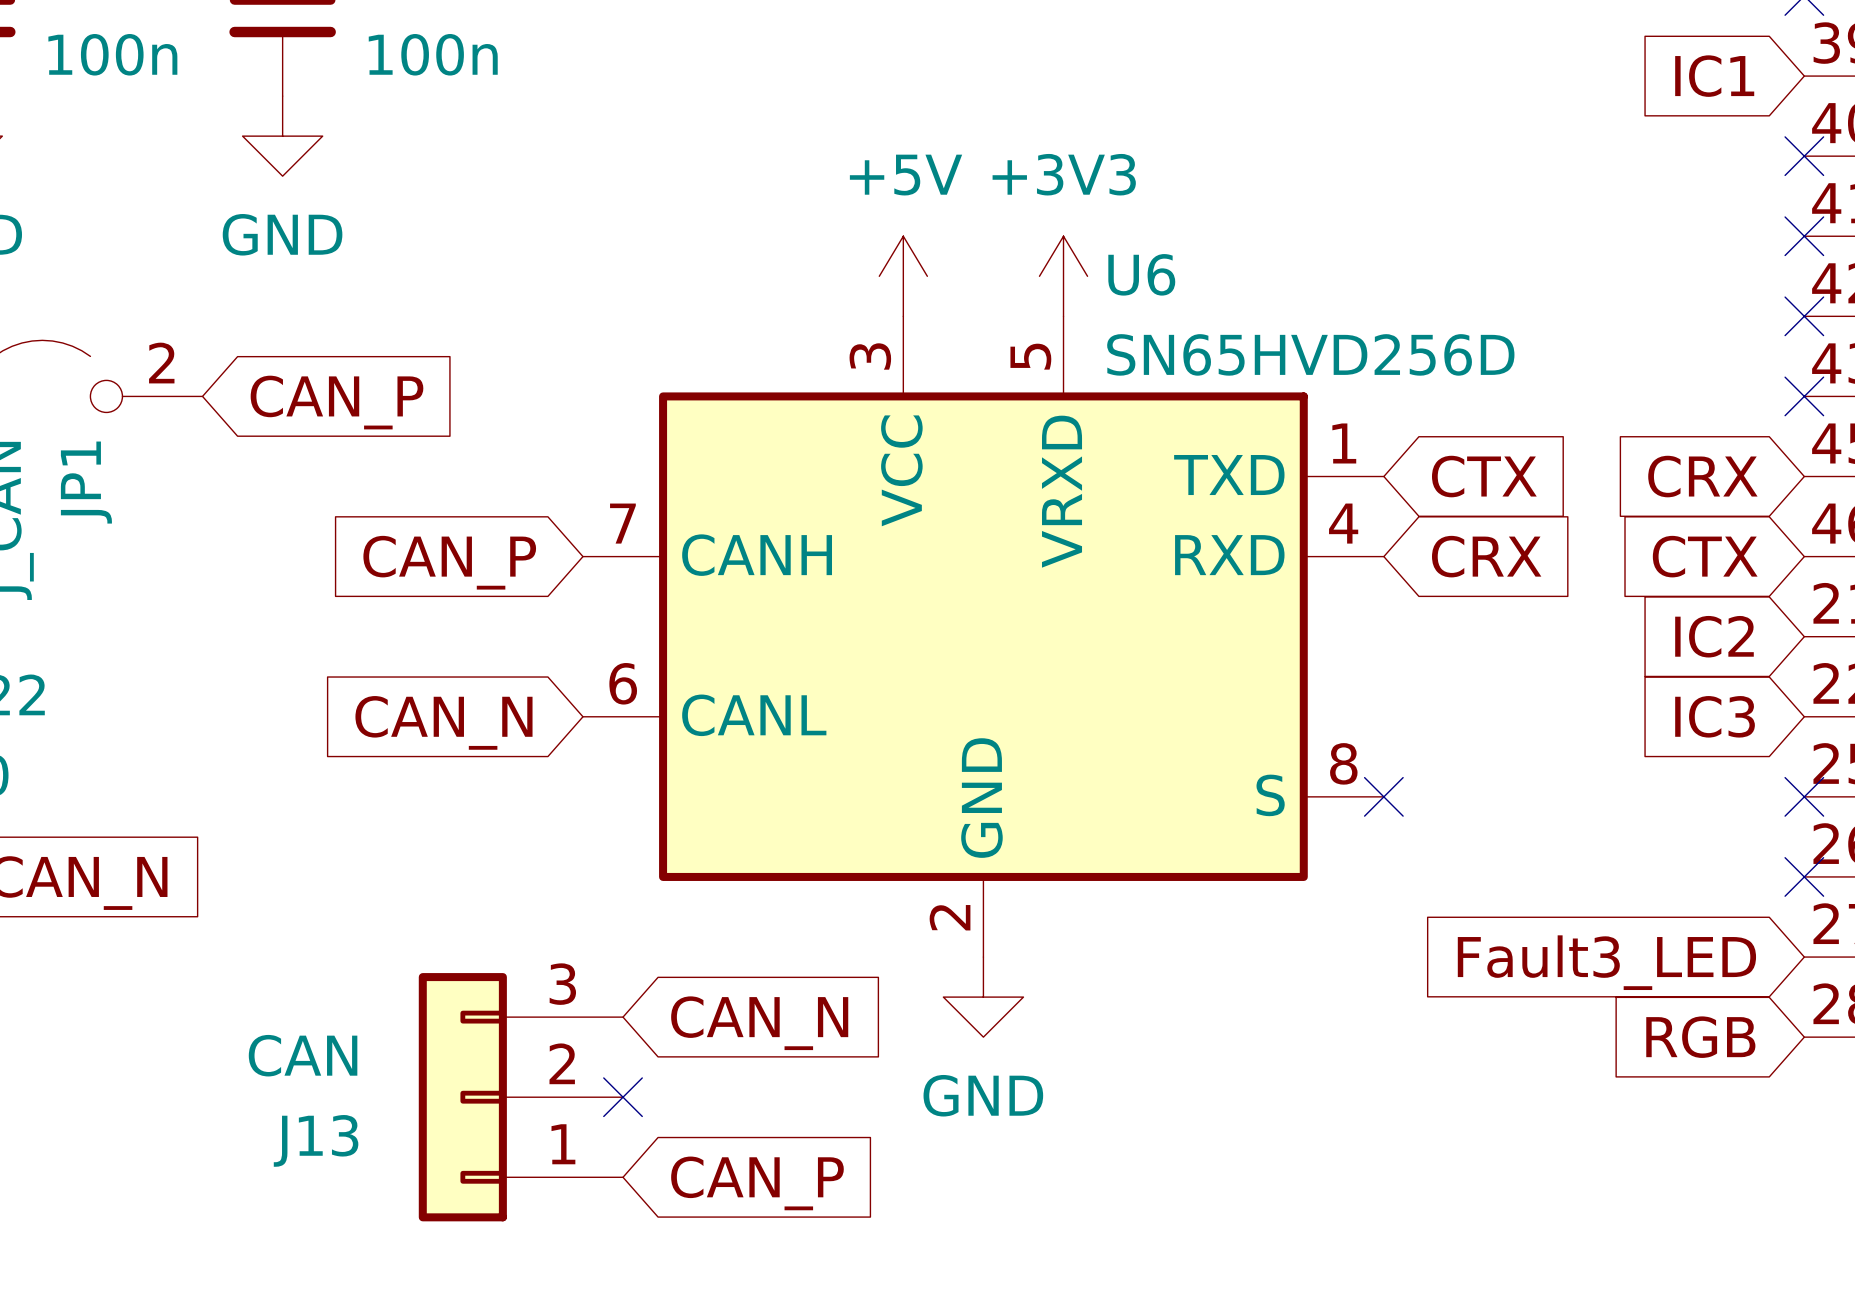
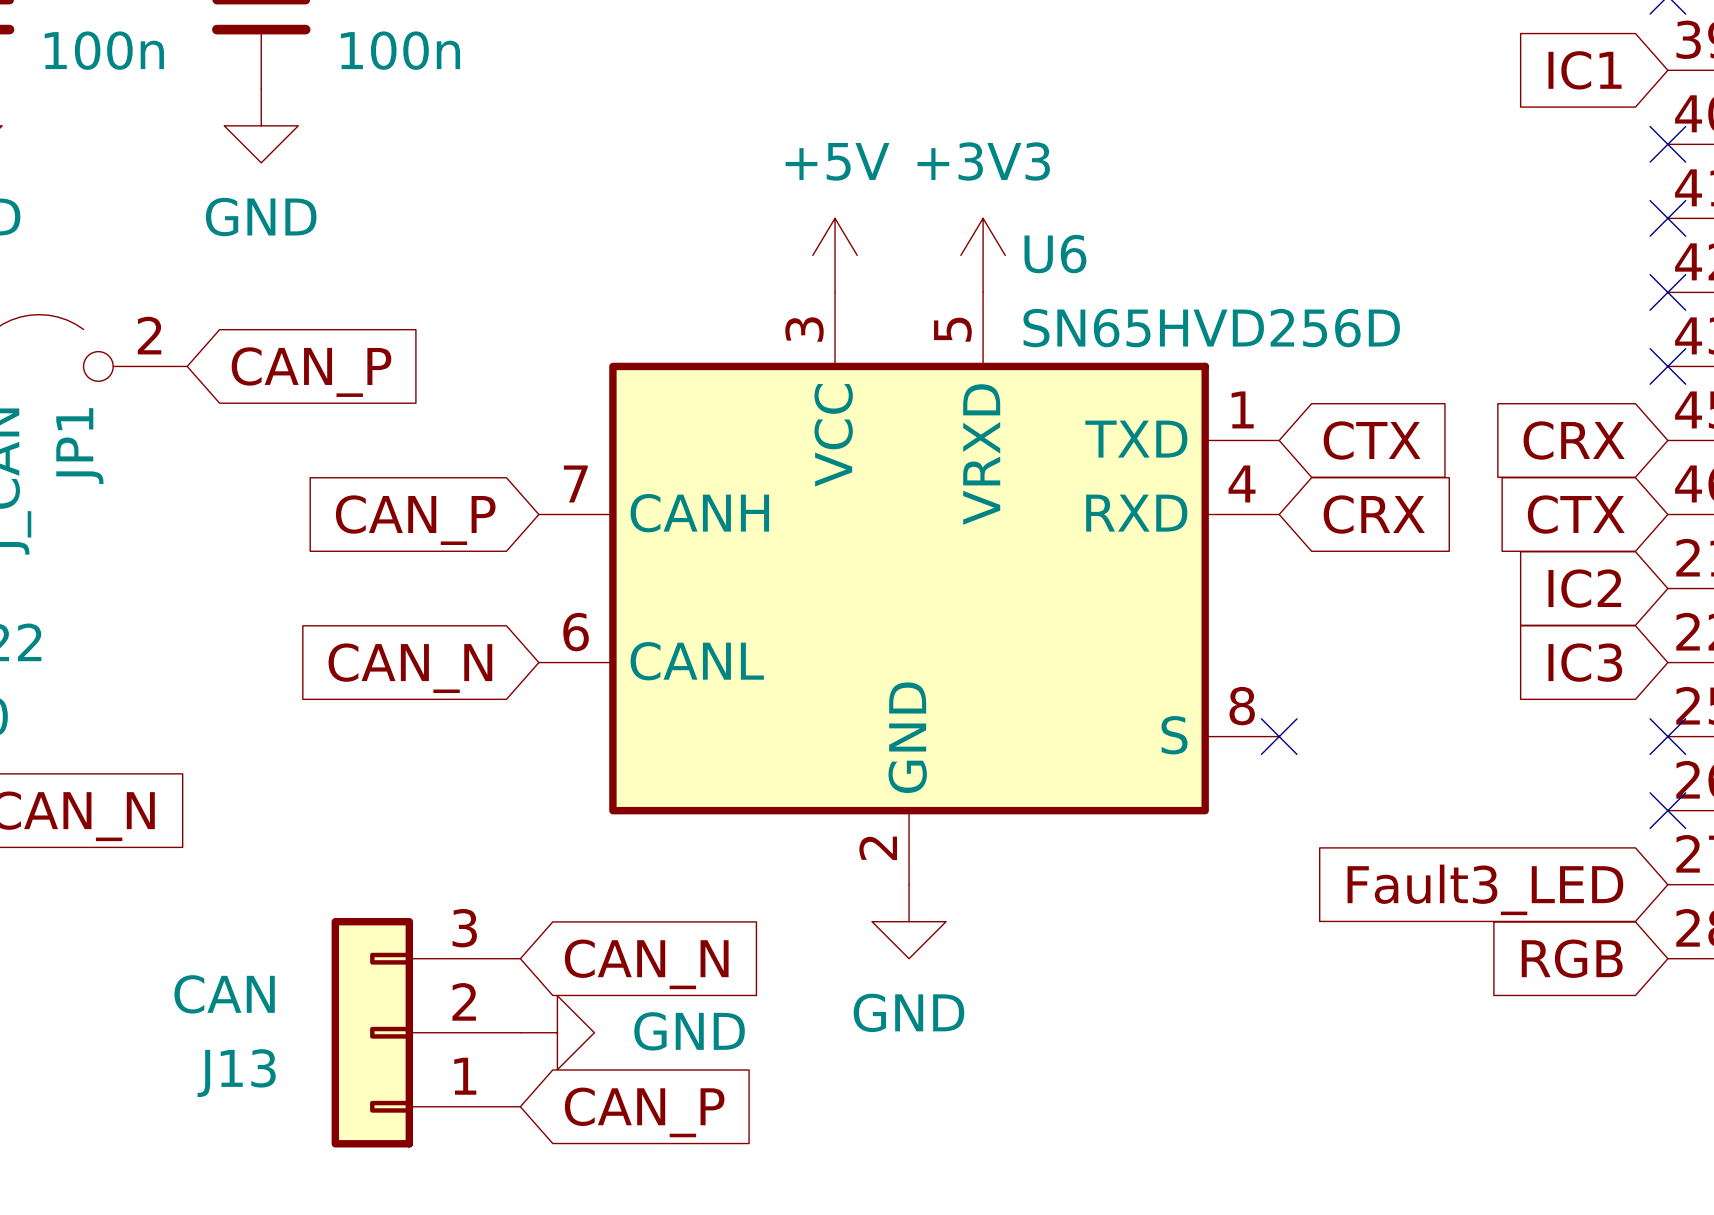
global label position: CAN_N (759, 1023) -> CAN_N (646, 964)
J13 position: (520, 1097) -> (425, 1032)
no-connect mark: (623, 1097) -> none
power symbol: none -> GND (557, 1032)
global label position: CAN_P (757, 1183) -> CAN_P (644, 1112)

